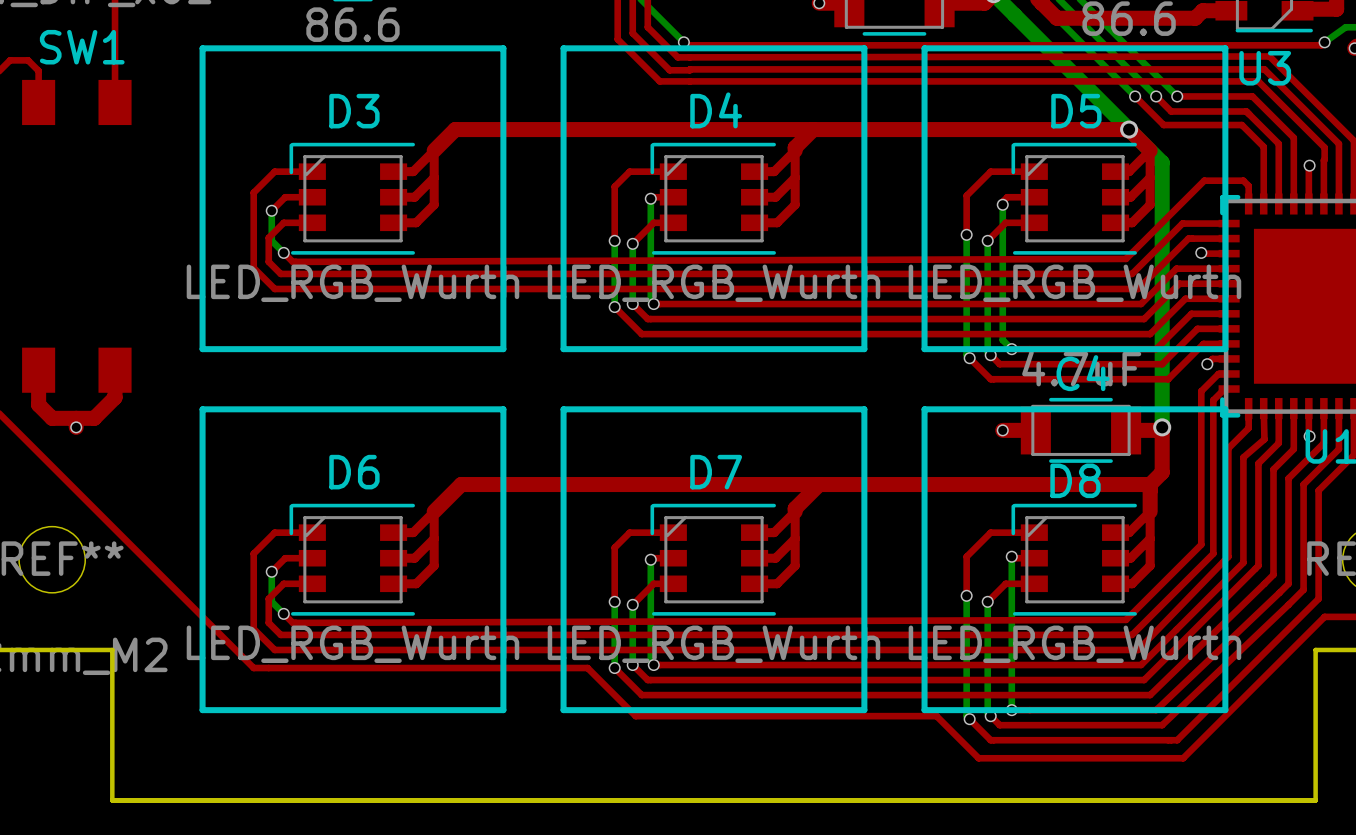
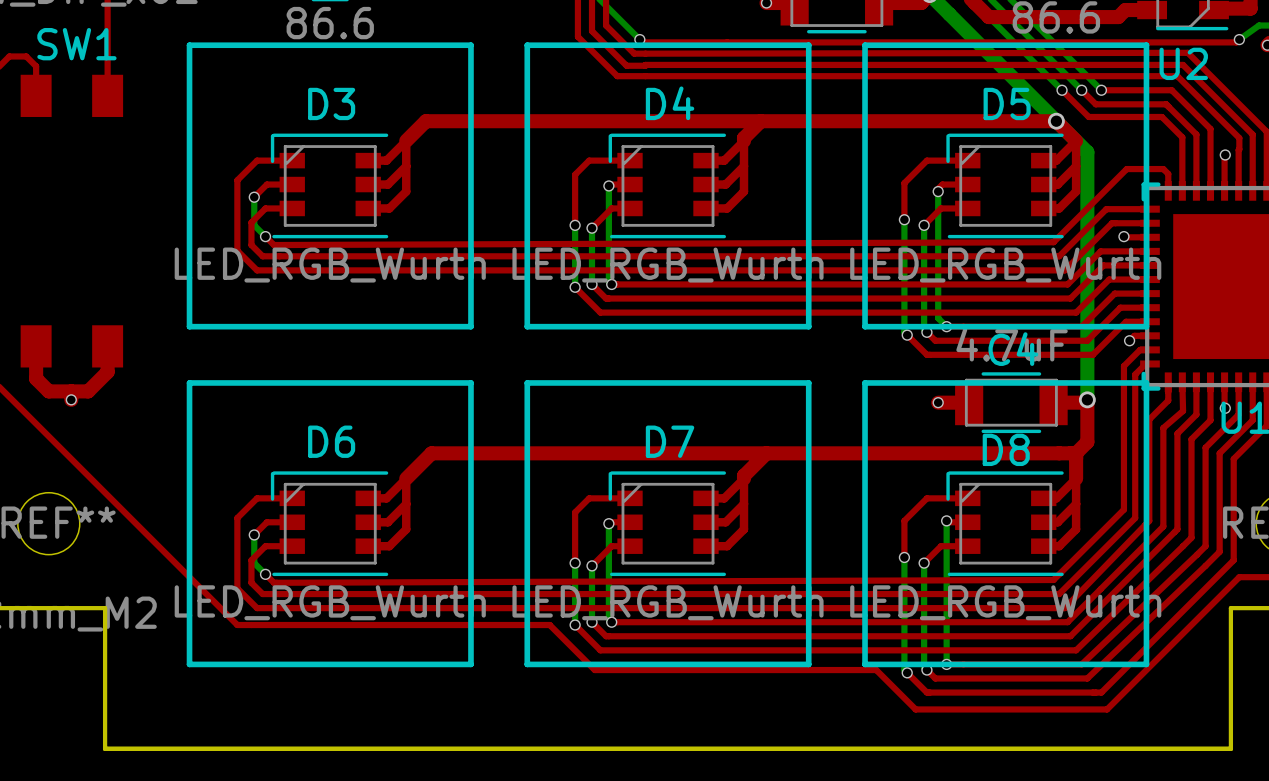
U3 name: U3 (1265, 68) -> U2 (1183, 63)

